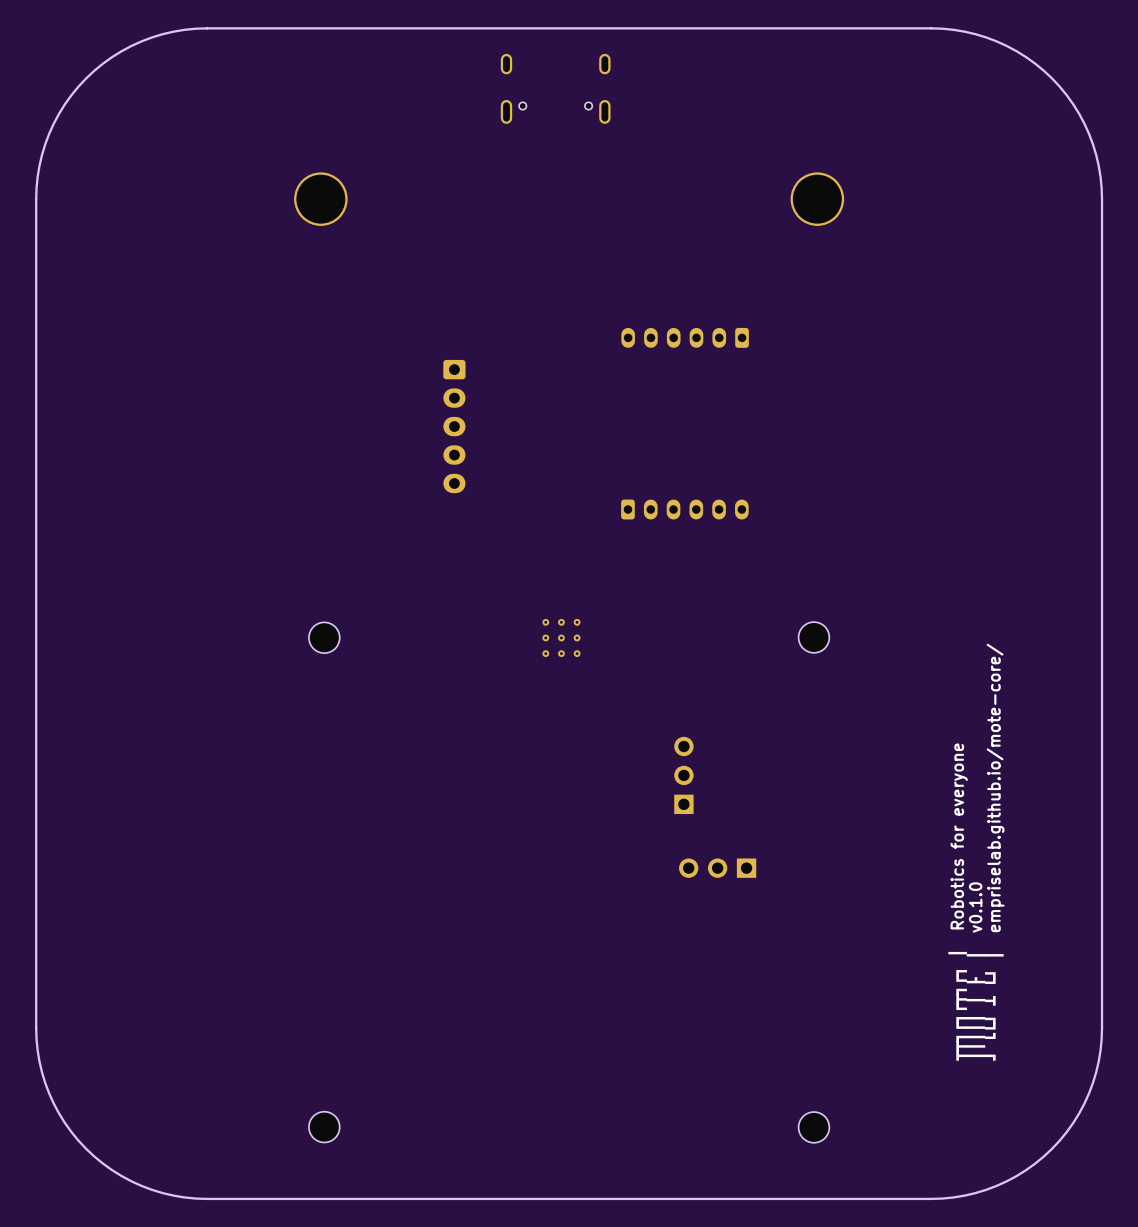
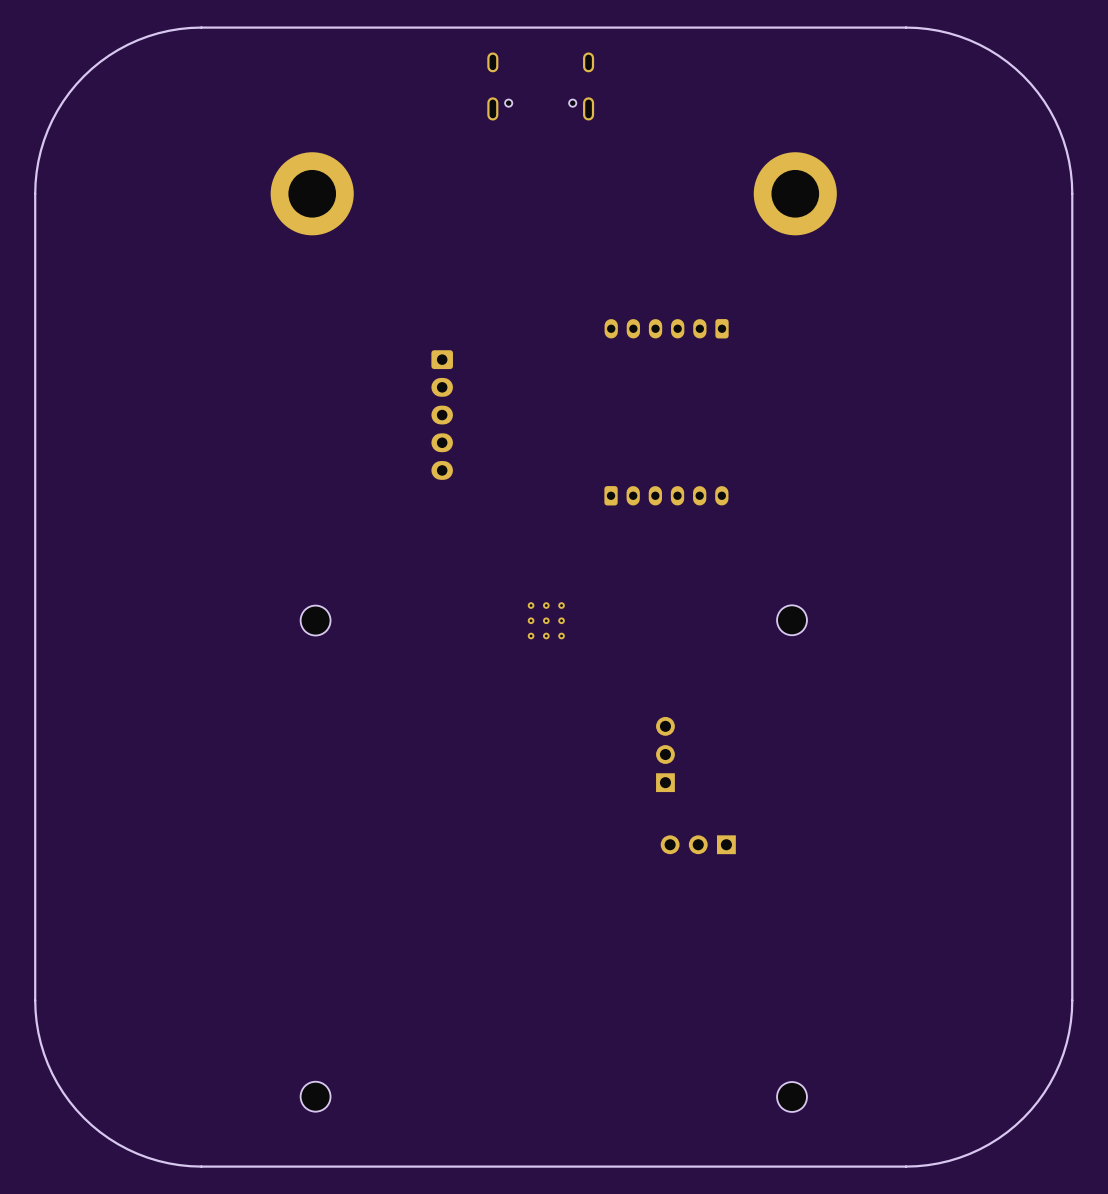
part footprint: [294, 172, 348, 226] -> [270, 152, 354, 236]
part footprint: [790, 172, 845, 226] -> [753, 152, 837, 236]
text: ┛ ┗┗┛ ┻ ┗┛ ┃ empriselab.github.io/mote-core/ (994, 852) -> none
text: ┳┳┓┏┓┏┳┓┏┓ ┃ Robotics for everyone (957, 902) -> none
text: ┃┃┃┃┃ ┃ ┣ ┃ v0.1.0 (975, 970) -> none

